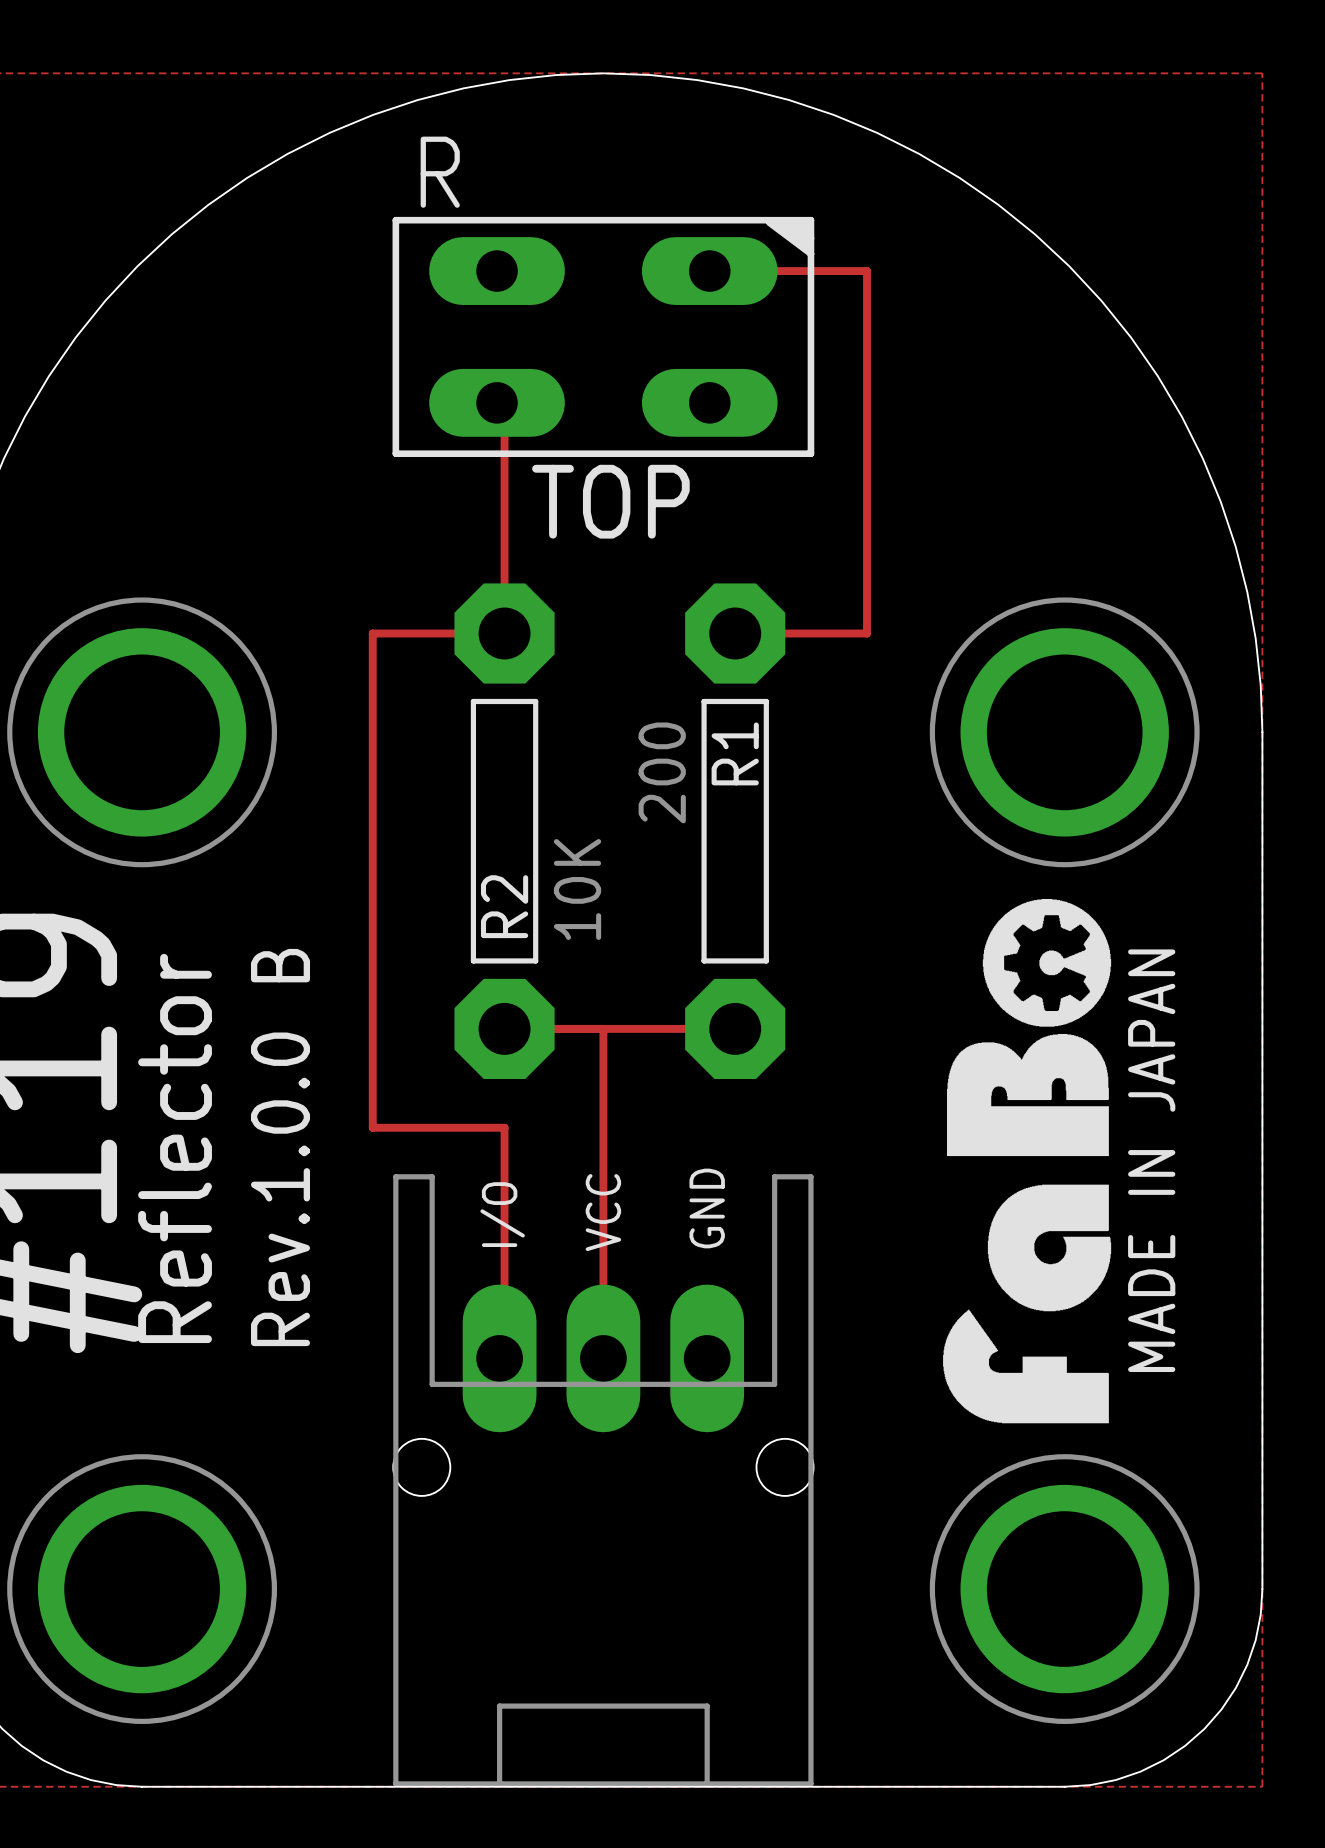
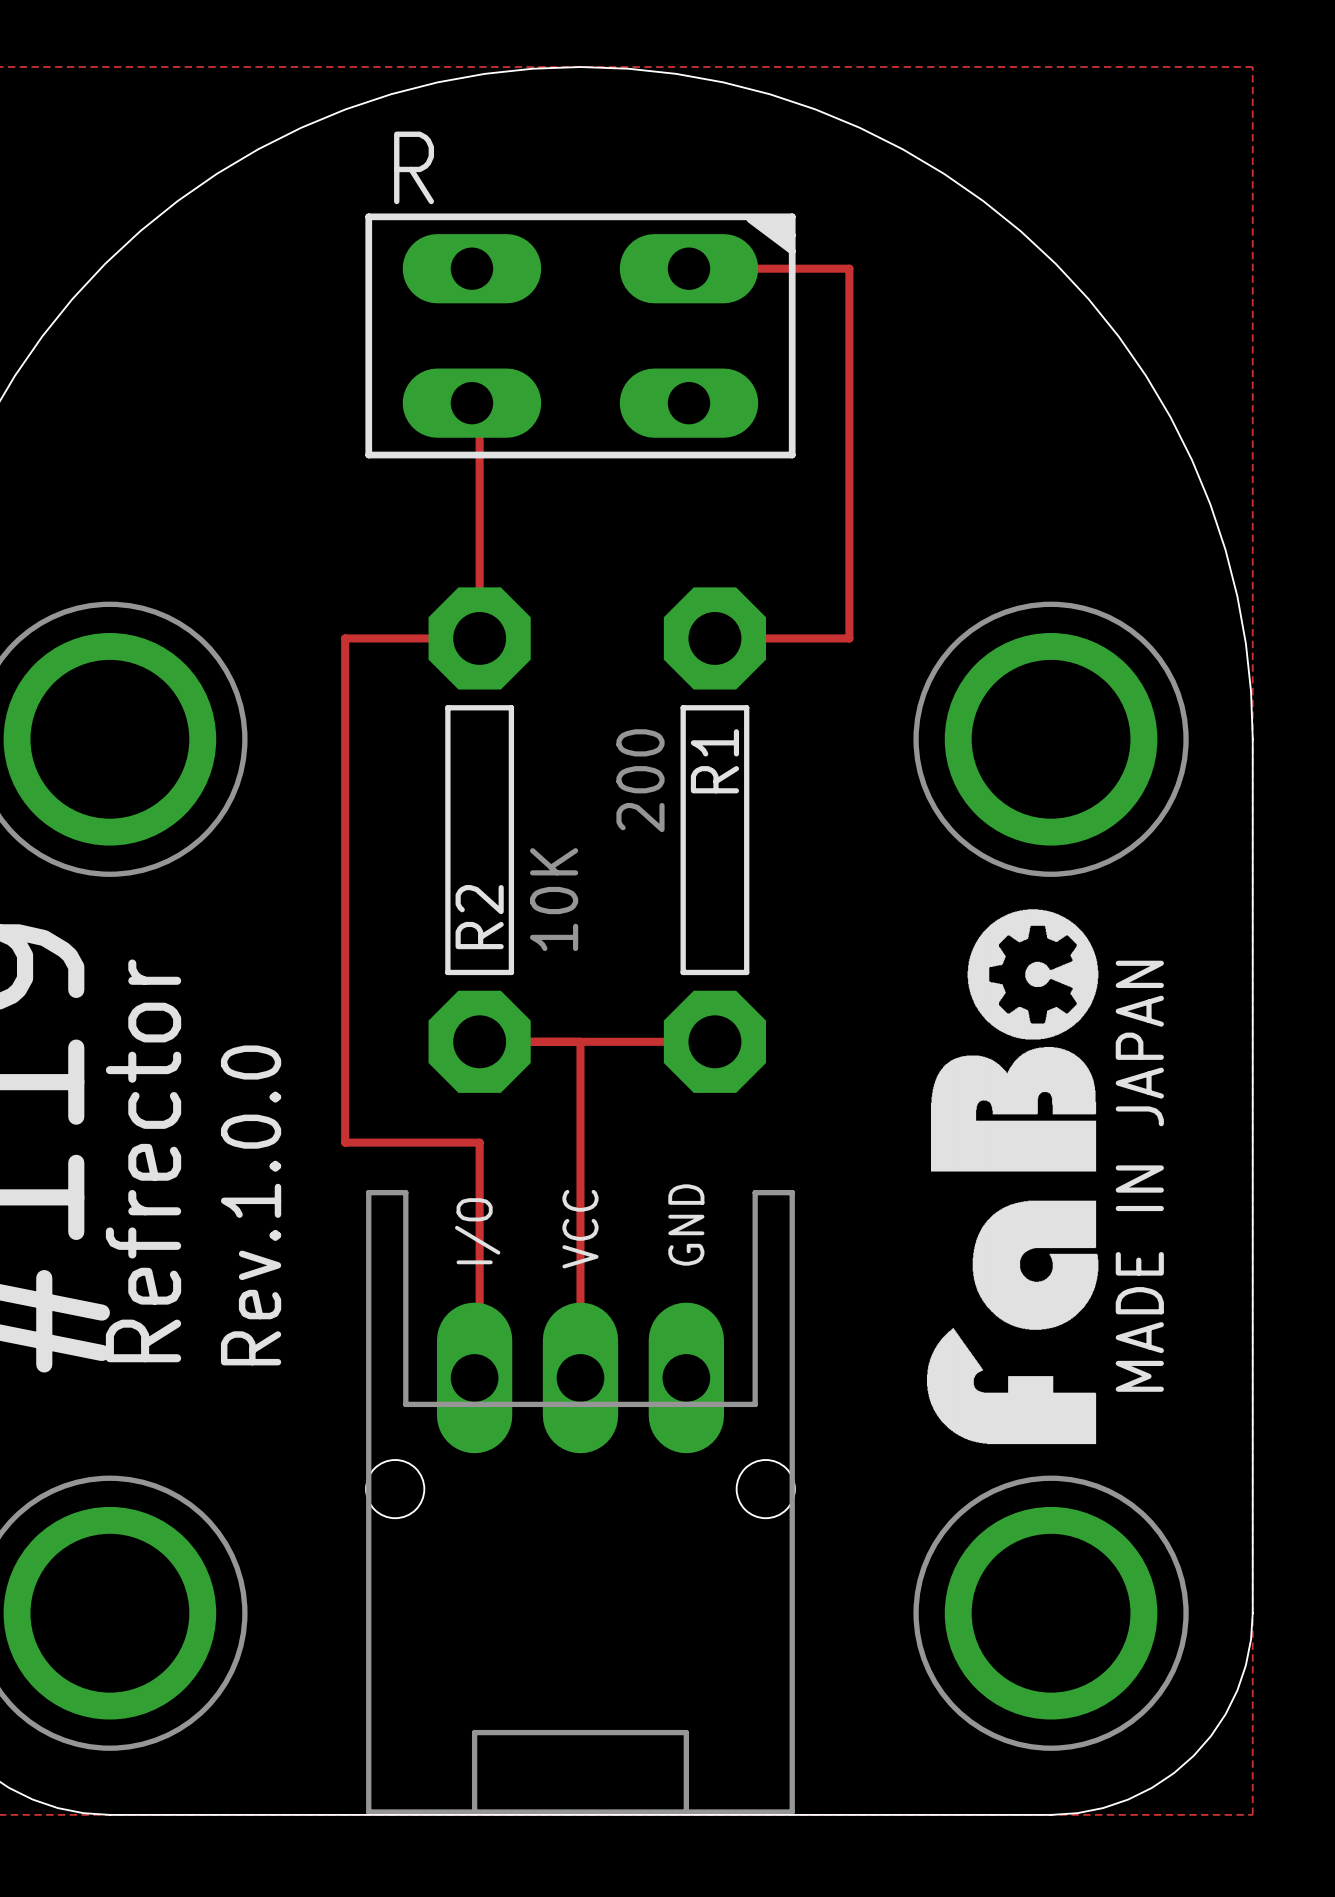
text: TOP (610, 501) -> none
text: Rev.1.0.0 B (280, 1147) -> Rev.1.0.0 (251, 1205)
text: Reflector (175, 1148) -> Refrector (143, 1160)

